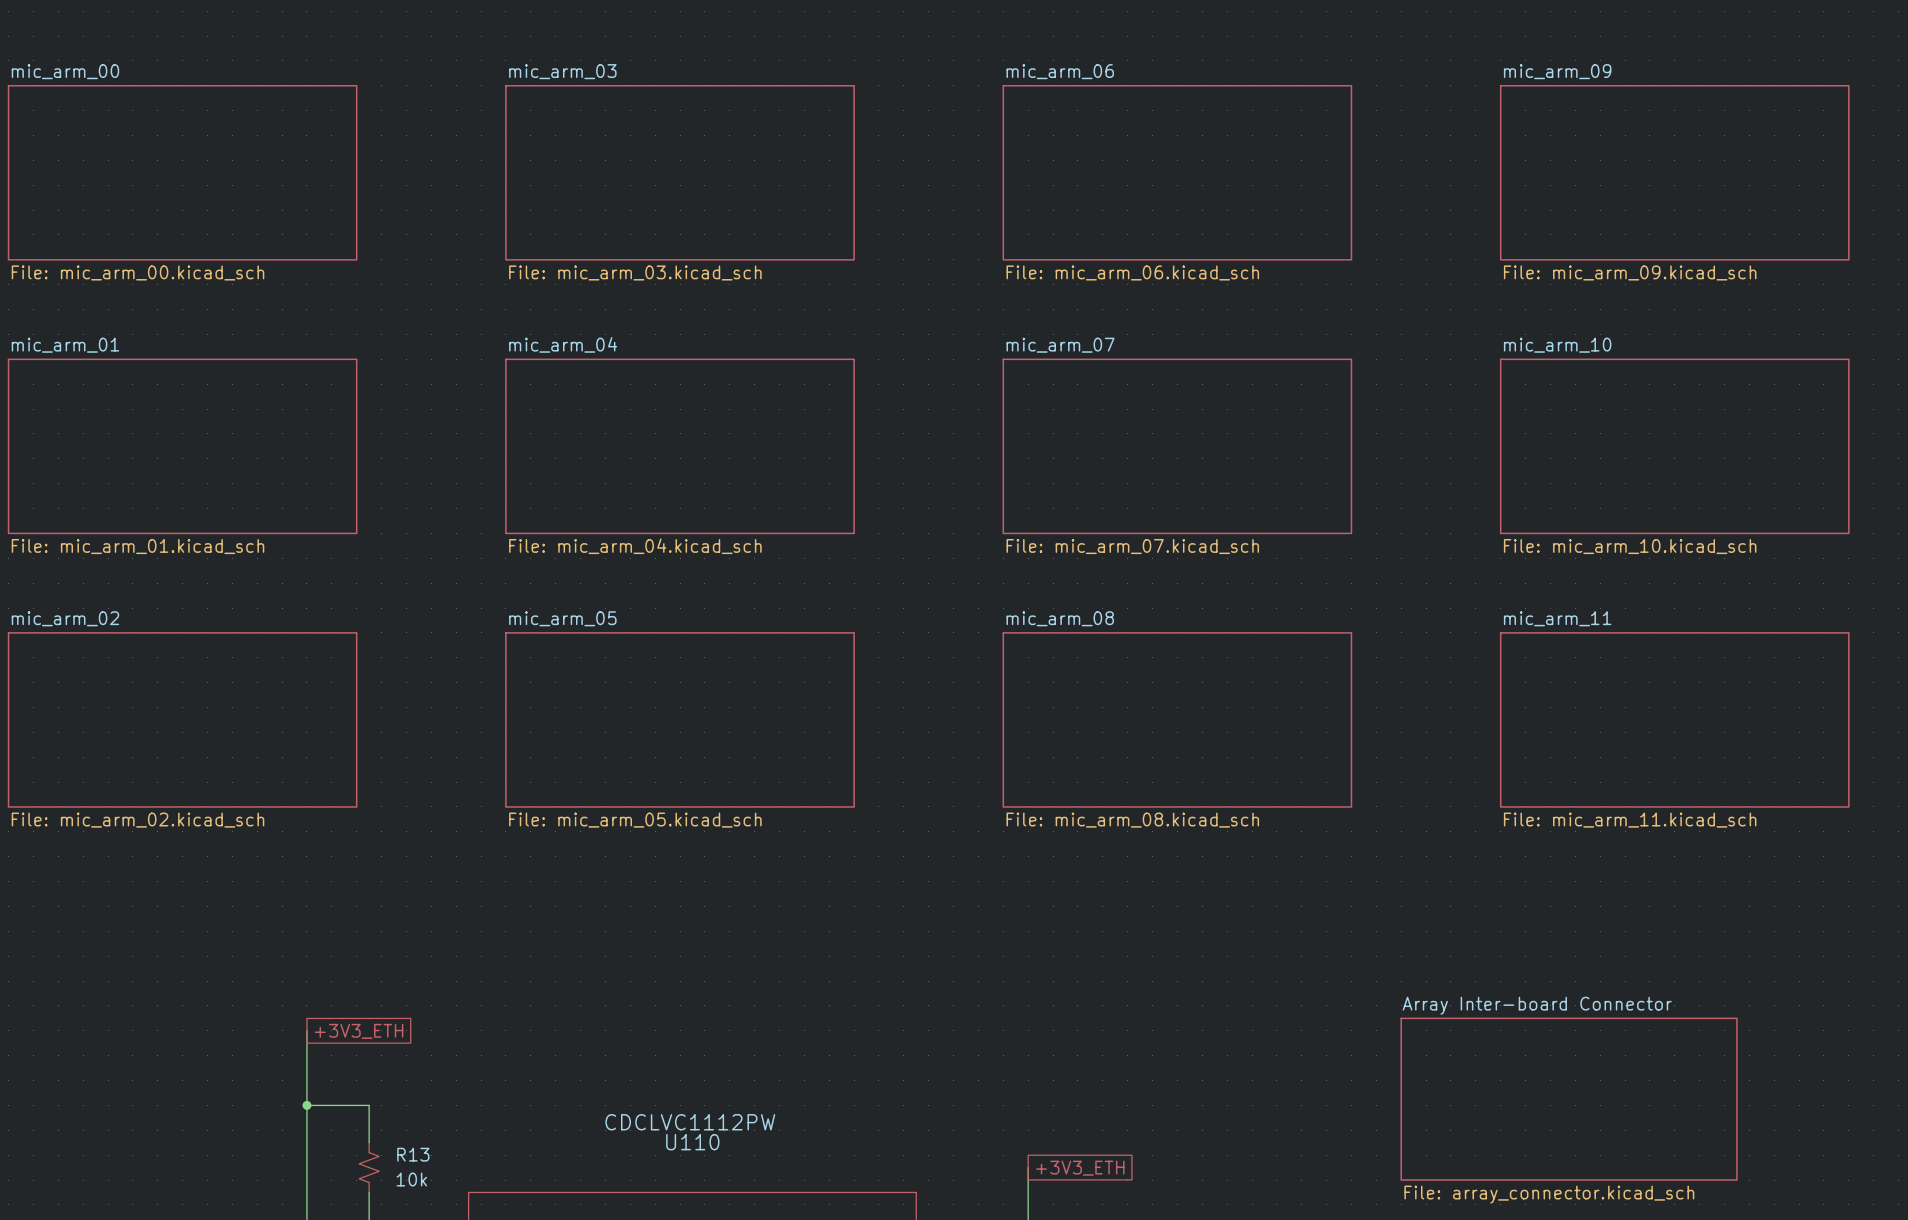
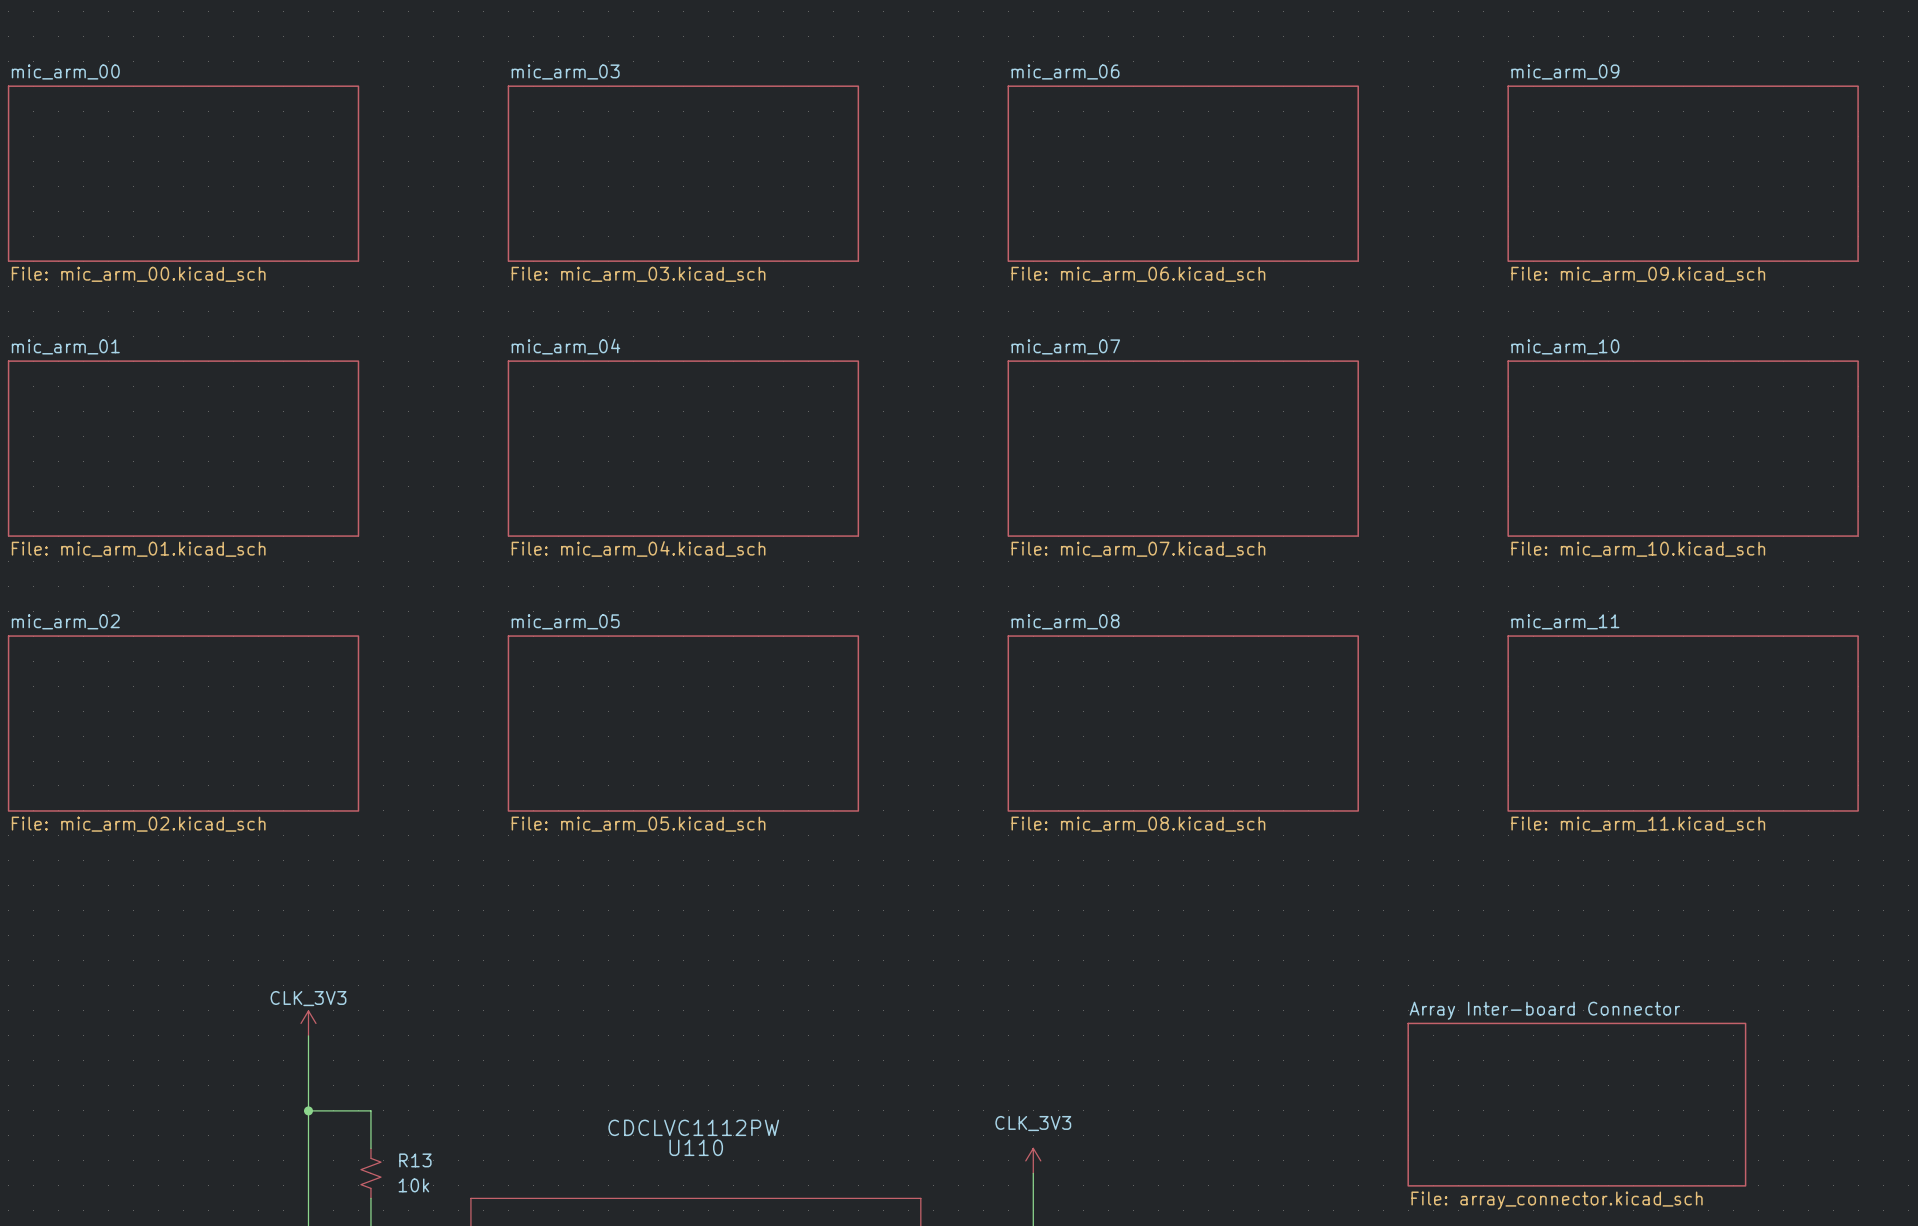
power symbol: none -> CLK_3V3 (308, 1023)
global label: +3V3_ETH (359, 1031) -> none
power symbol: none -> CLK_3V3 (1033, 1160)
global label: +3V3_ETH (1080, 1168) -> none

